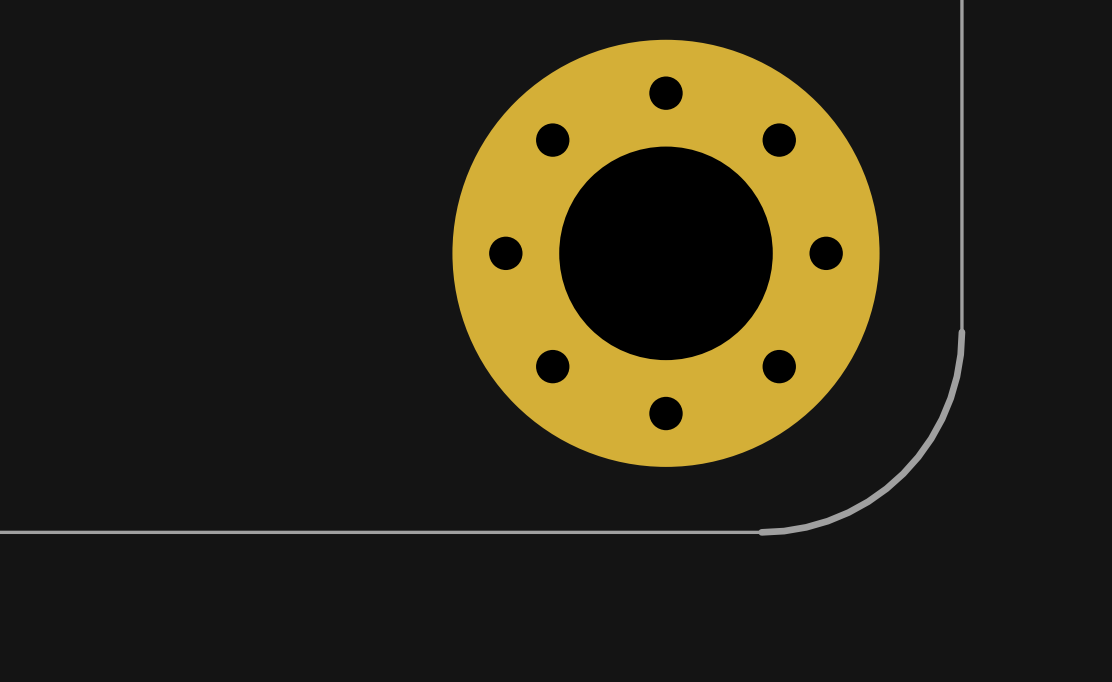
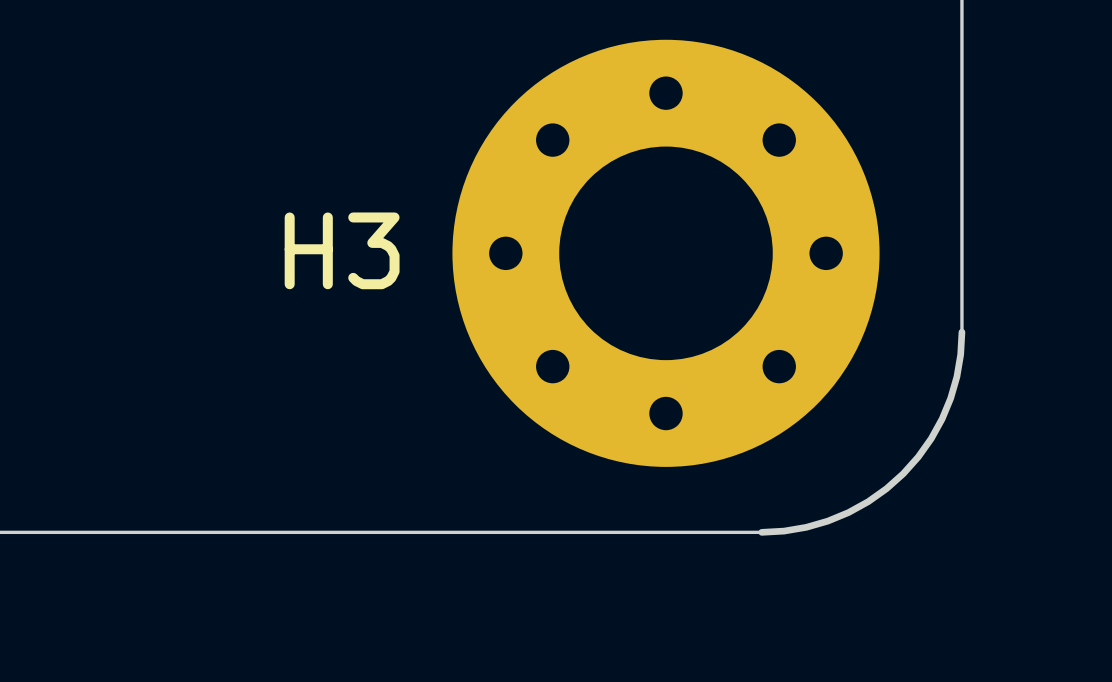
H3 name: none -> H3 (342, 250)

